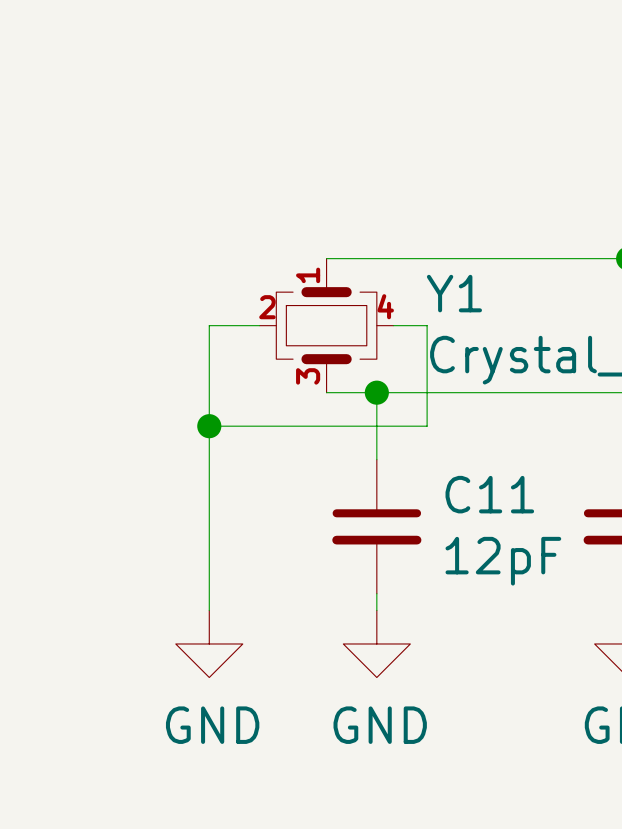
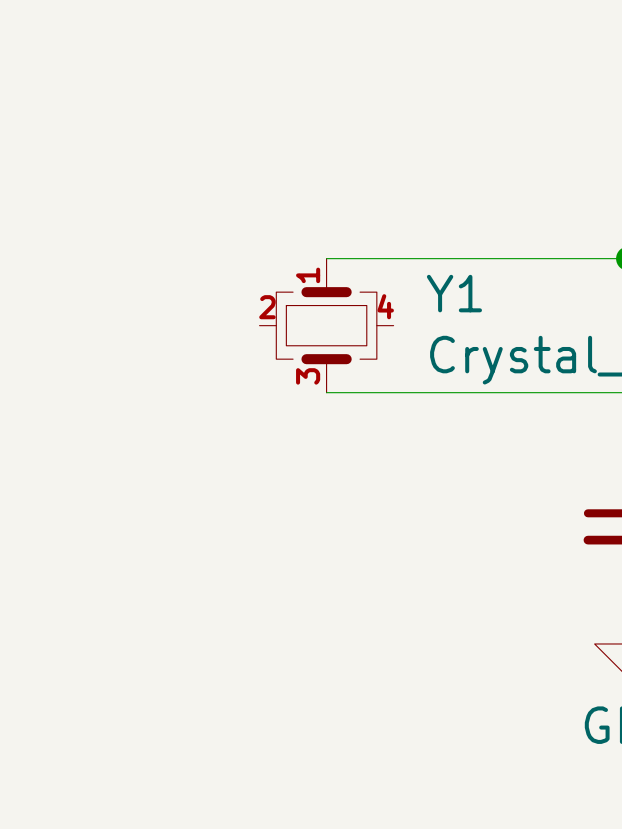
wire: (259, 325) (209, 325) (209, 610) -> none
wire: (393, 325) (427, 325) (427, 426) (209, 426) -> none
wire: (376, 392) (376, 459) -> none
junction: (376, 392) -> none
junction: (209, 426) -> none
C11: 12pF (376, 526) -> none
wire: (376, 593) (376, 610) -> none
power symbol: GND (209, 643) -> none
power symbol: GND (376, 643) -> none

